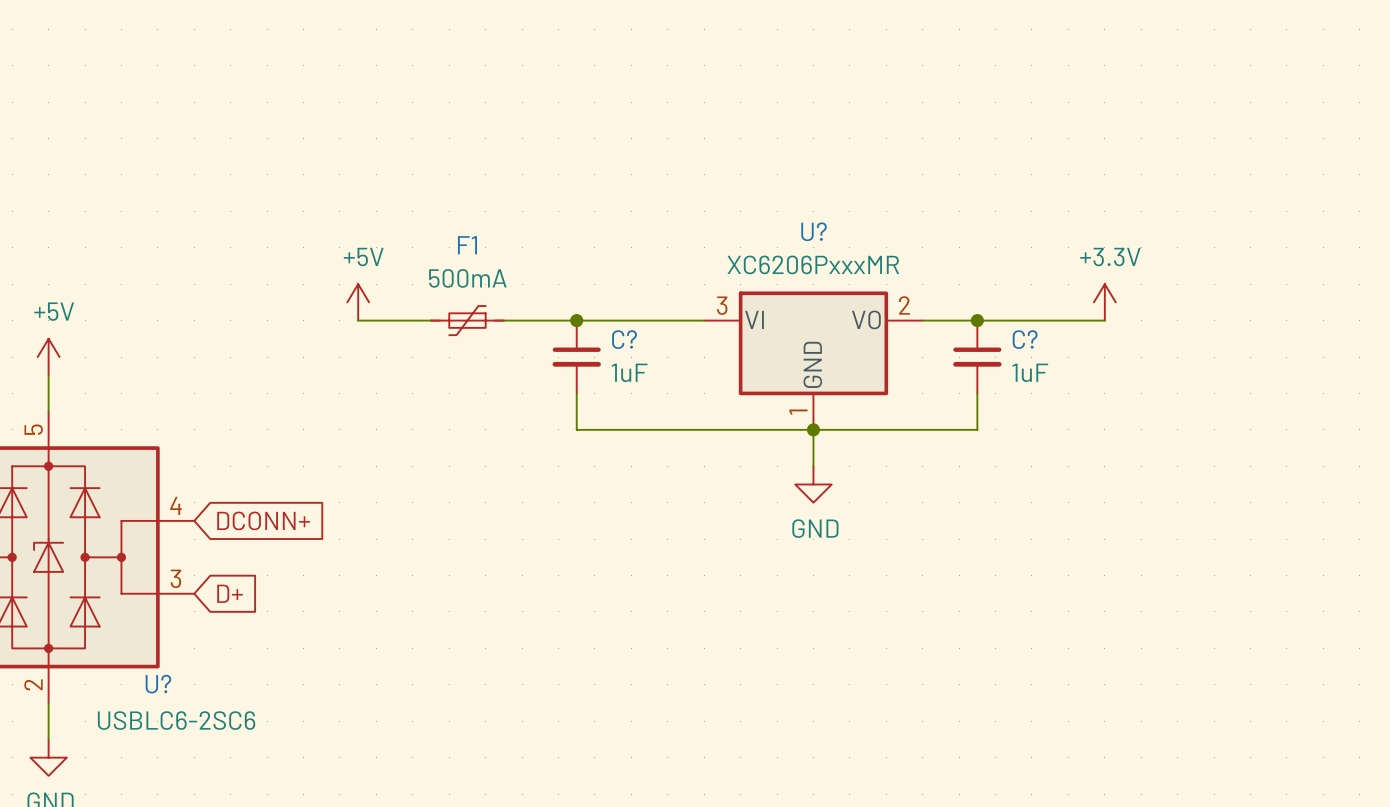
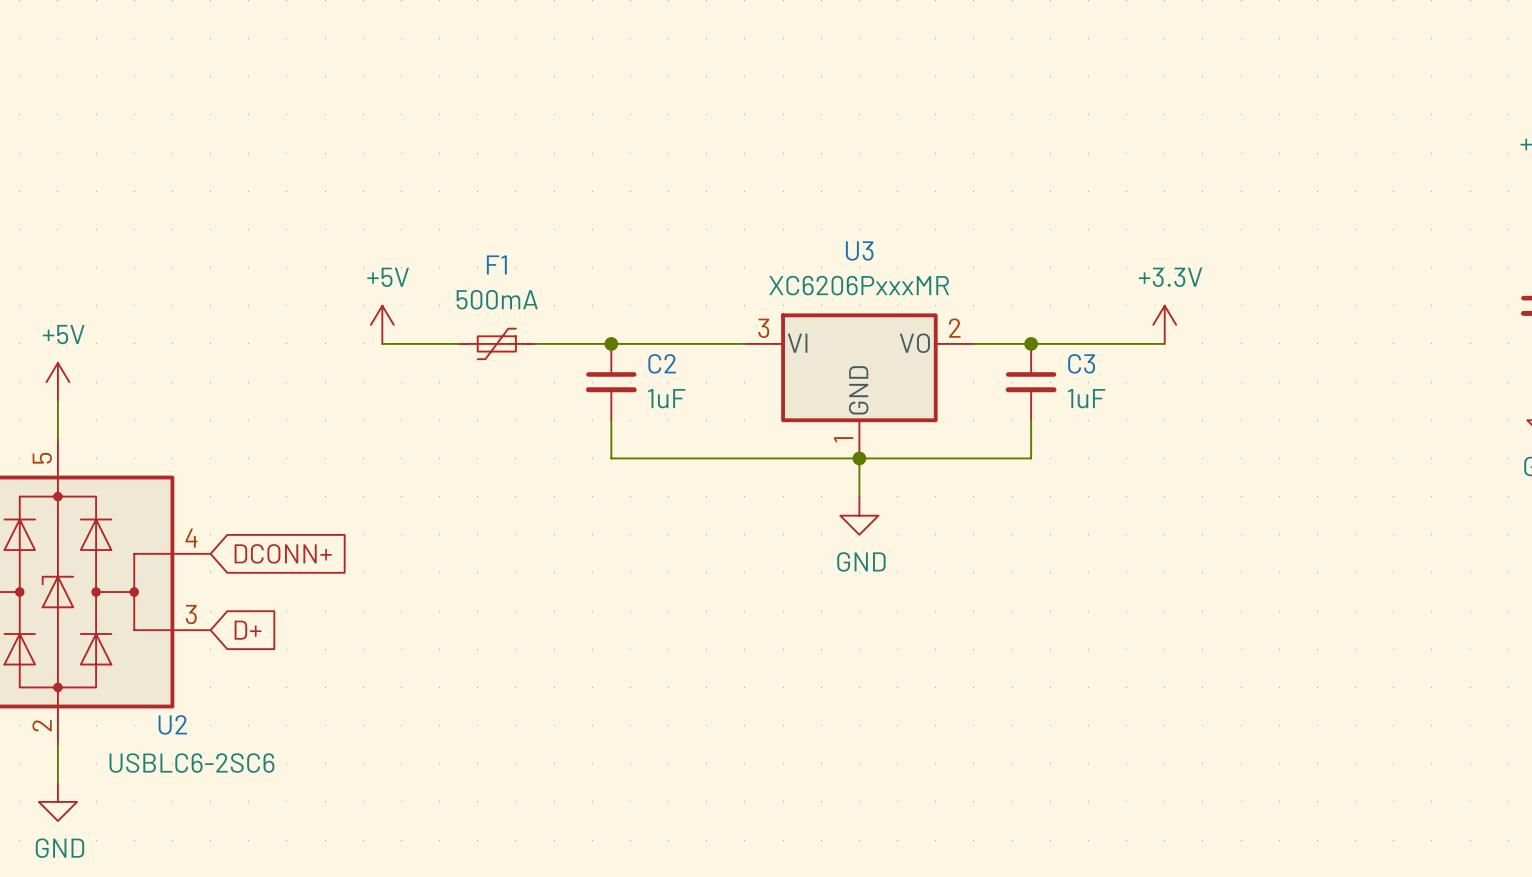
U? name: U? (814, 231) -> U3 (859, 250)
C? name: C? (624, 339) -> C2 (662, 363)
C? name: C? (1025, 339) -> C3 (1081, 363)
U? name: U? (158, 684) -> U2 (172, 724)

